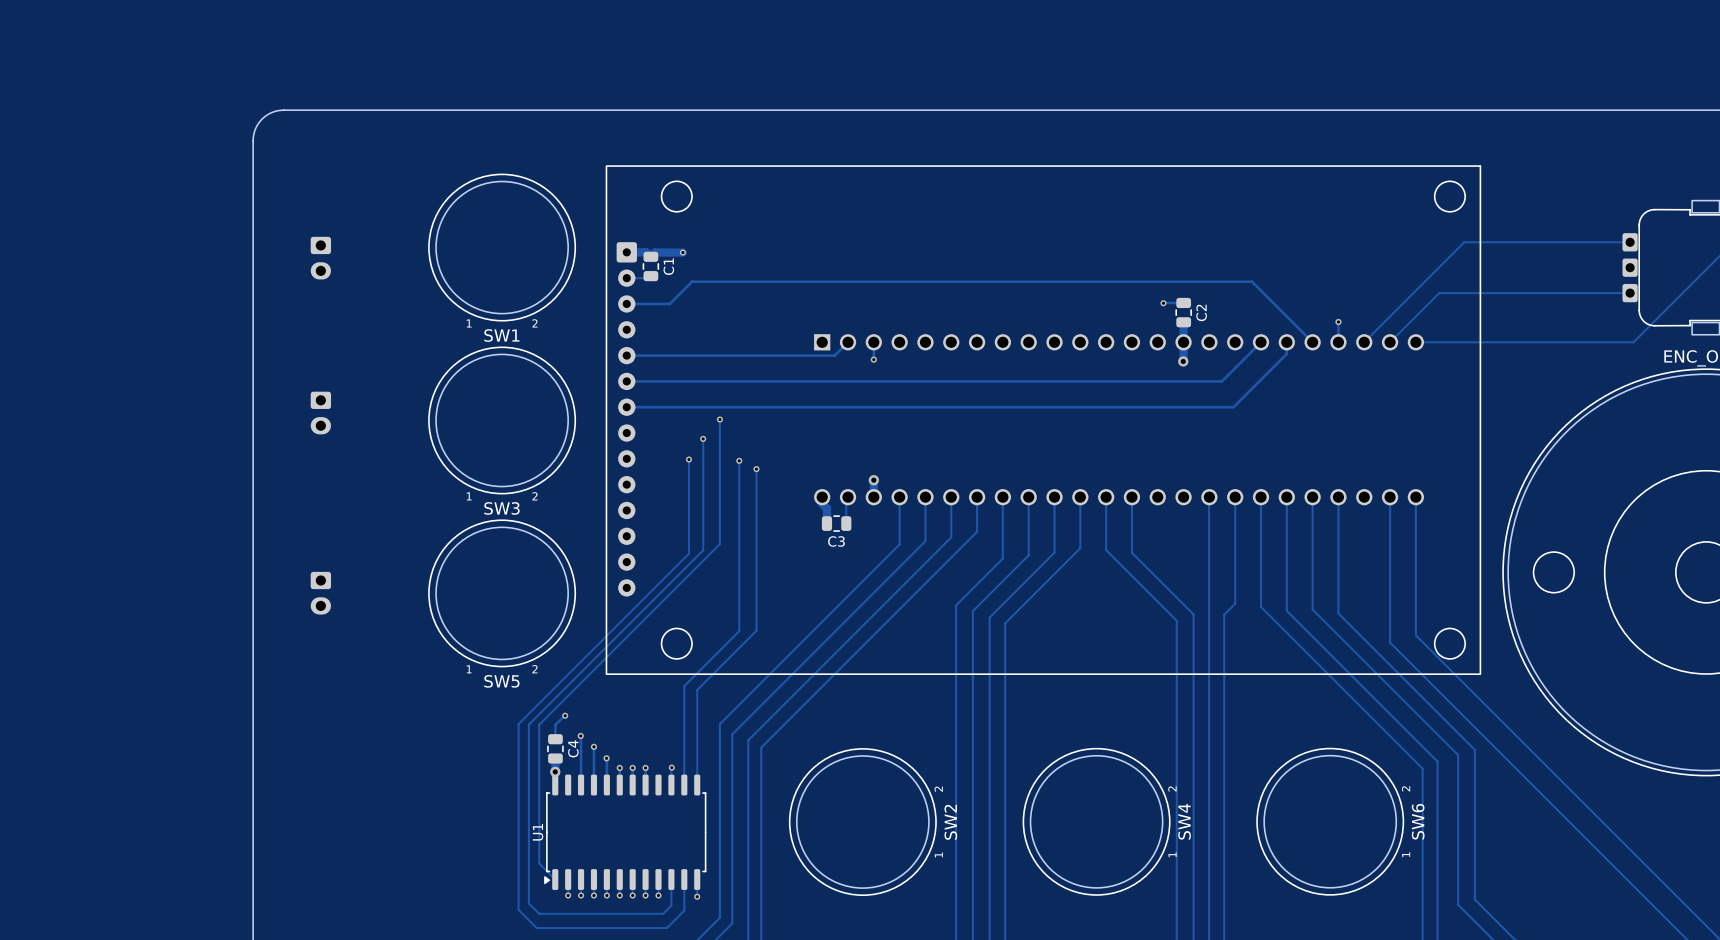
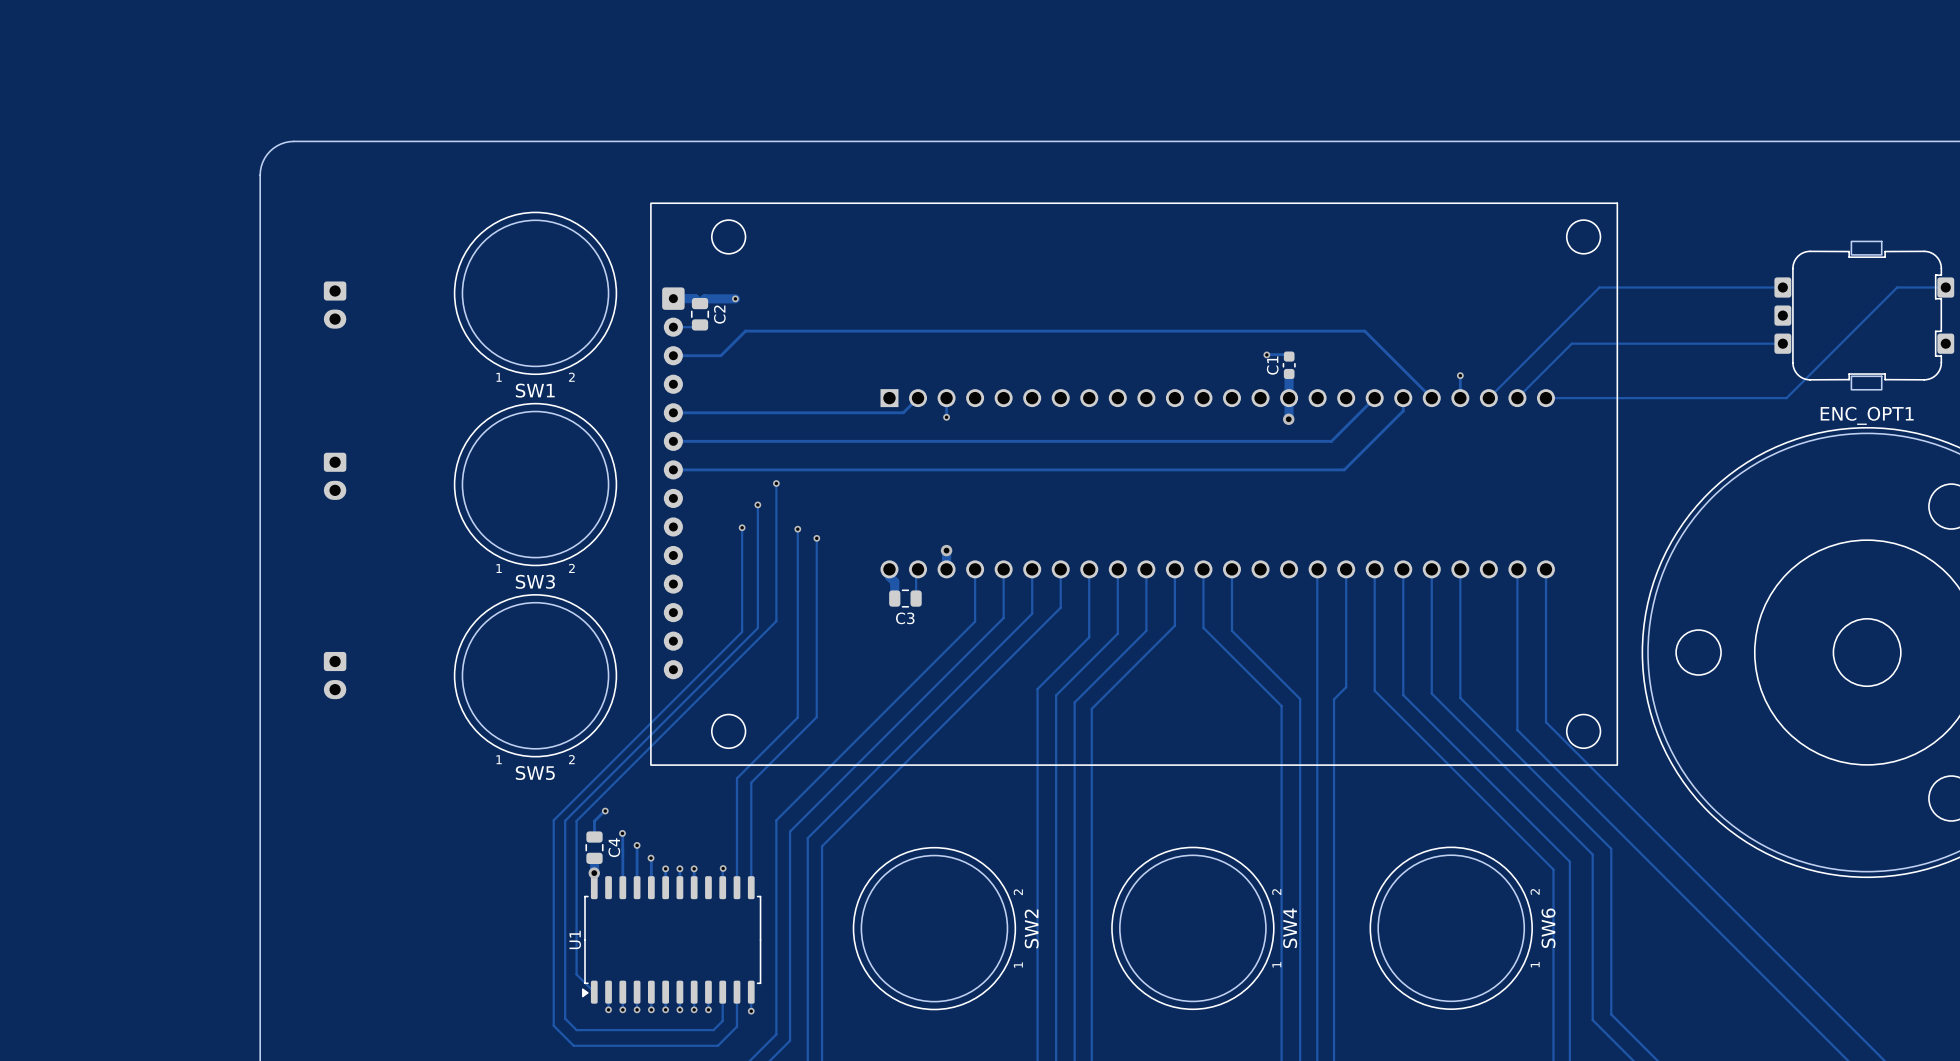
C1 name: C1 (668, 266) -> C2 (719, 314)
C2: (1183, 312) -> none
C1: none -> (1289, 365)

